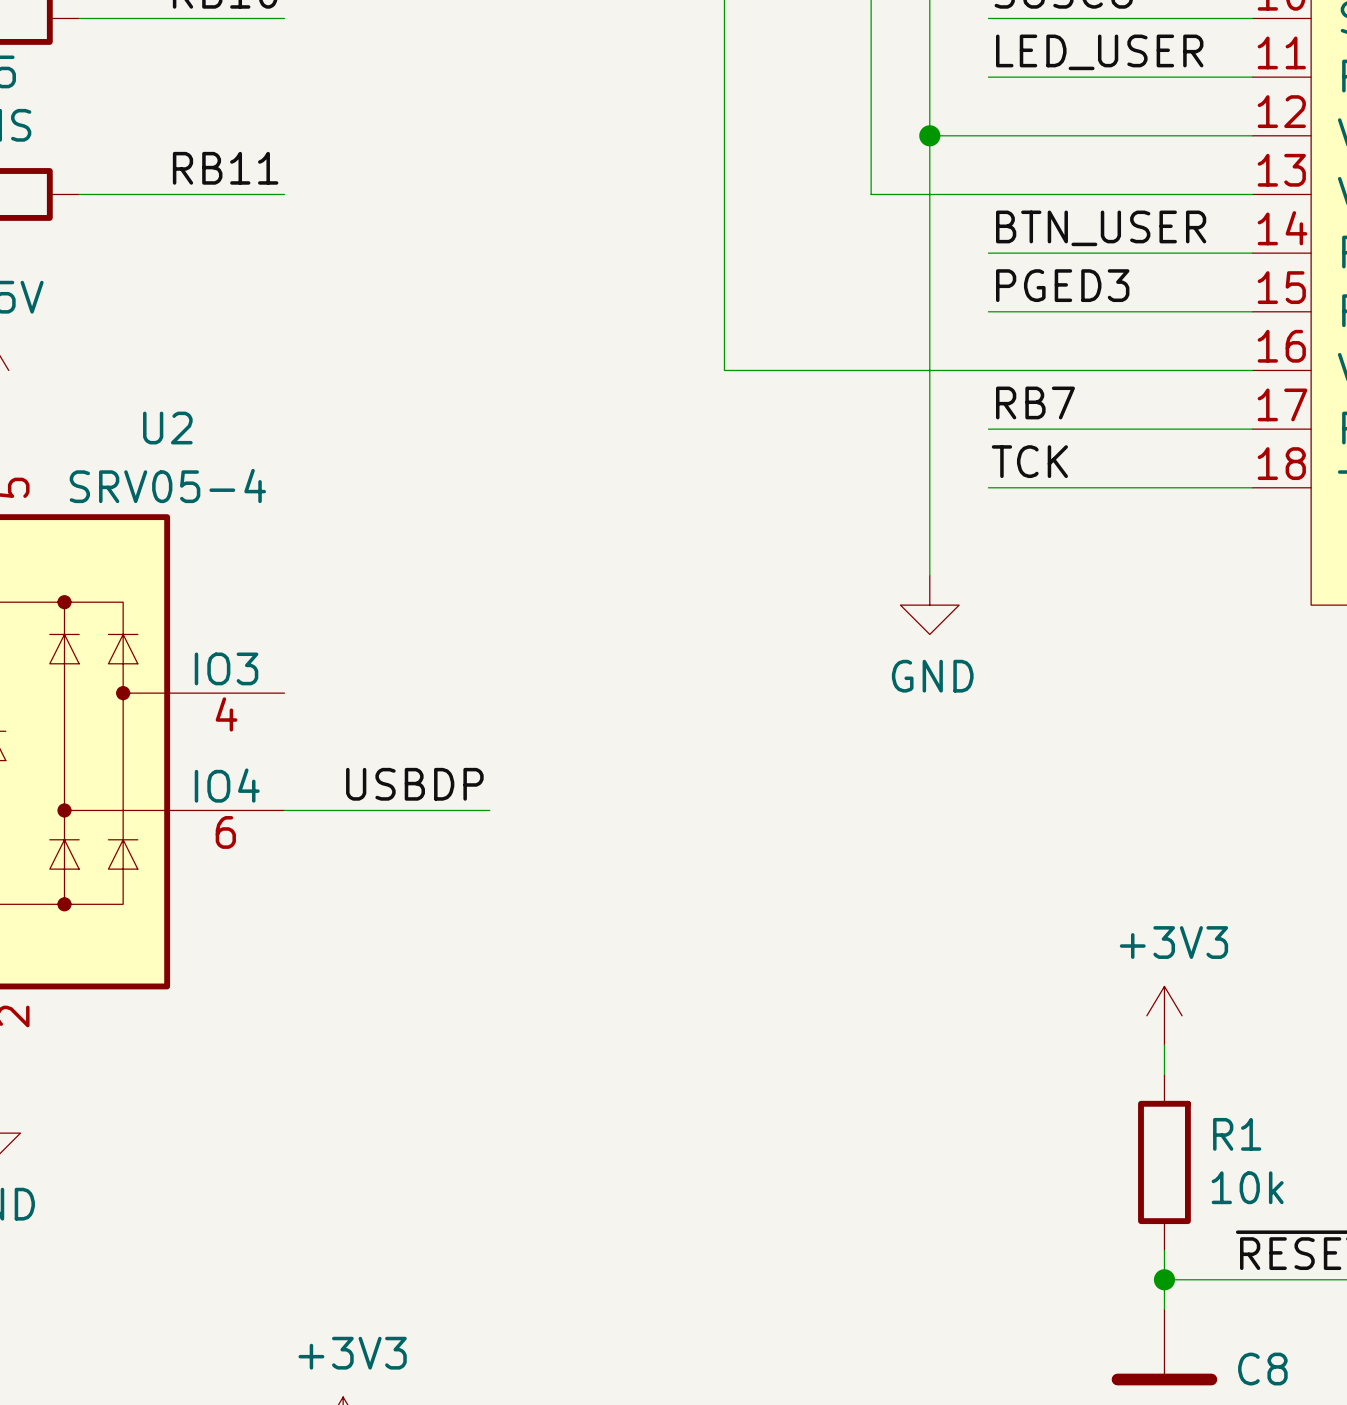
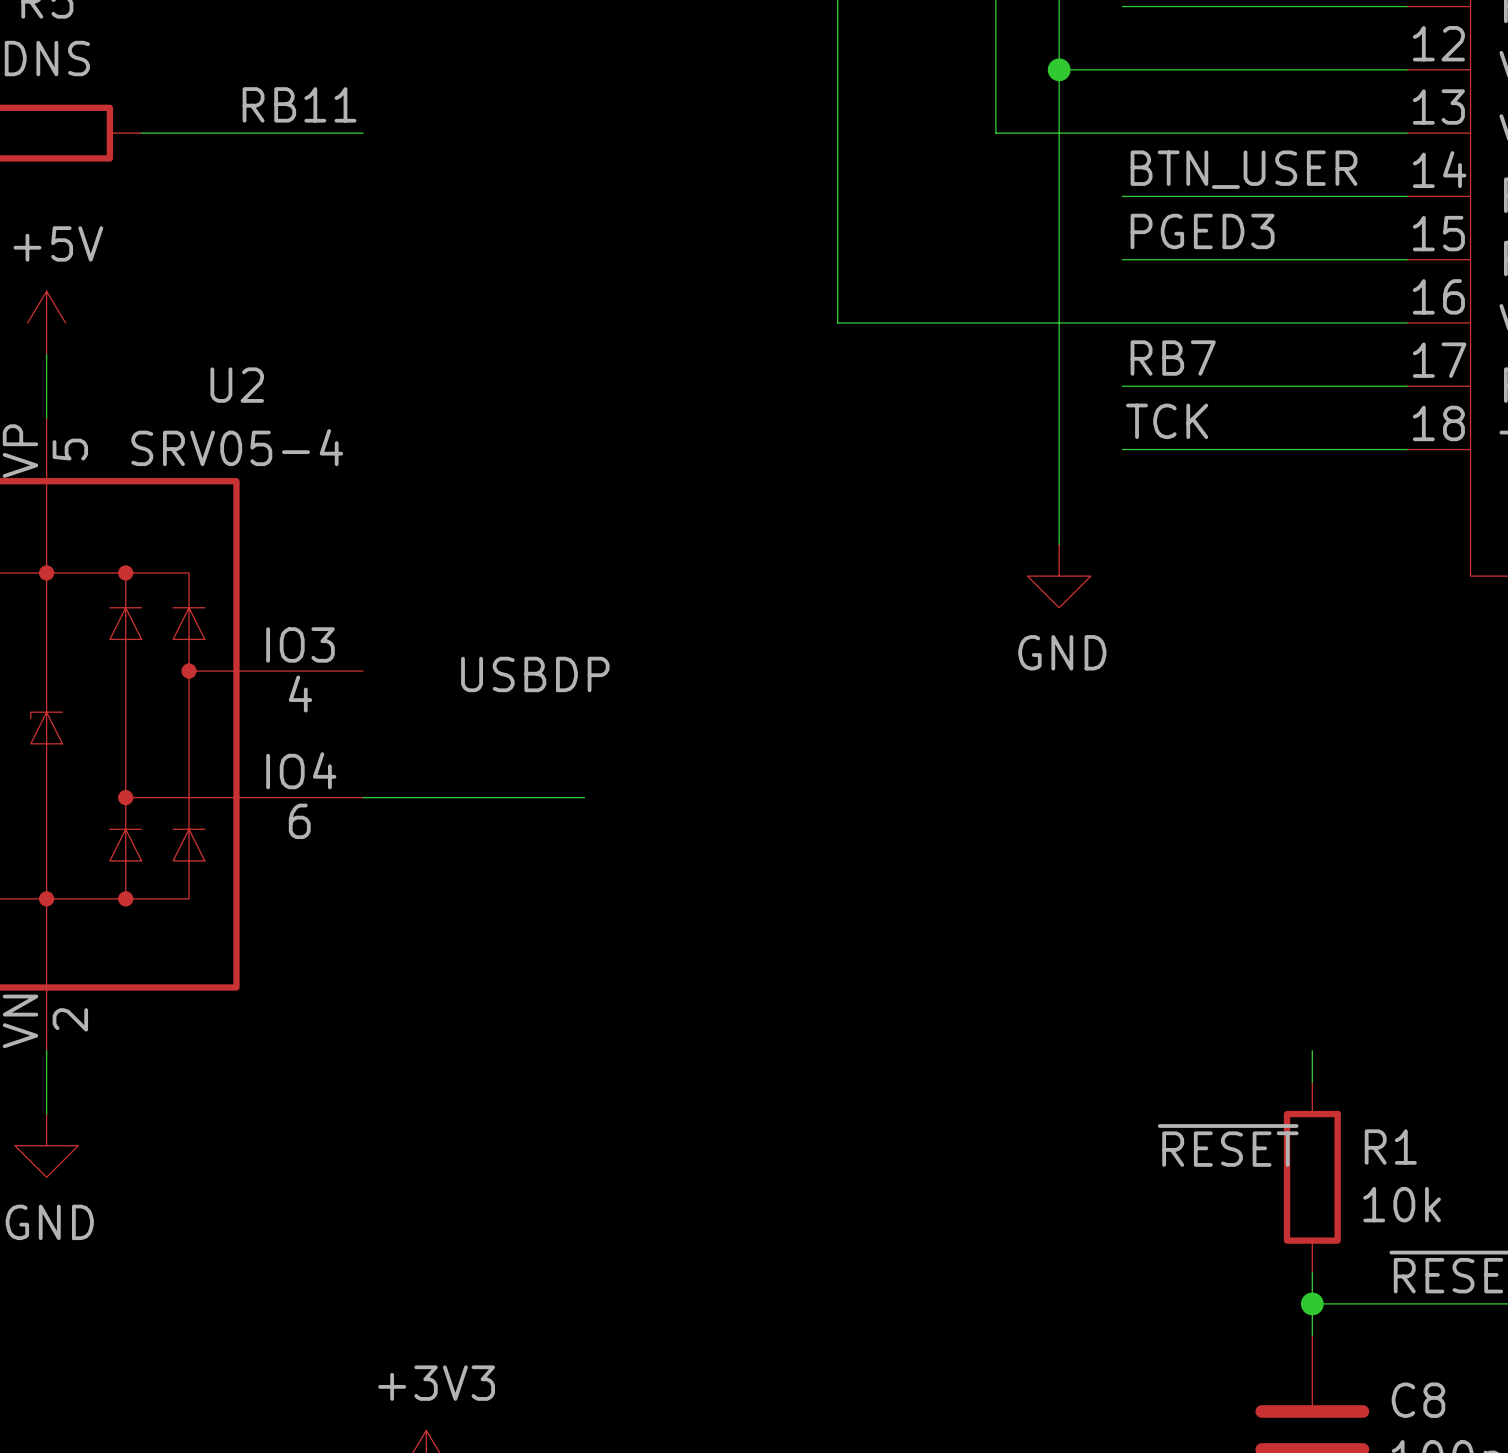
label position: USBDP (414, 784) -> USBDP (535, 674)
power symbol: +3V3 (1164, 1015) -> none
label: none -> ~{RESET} (1228, 1145)

